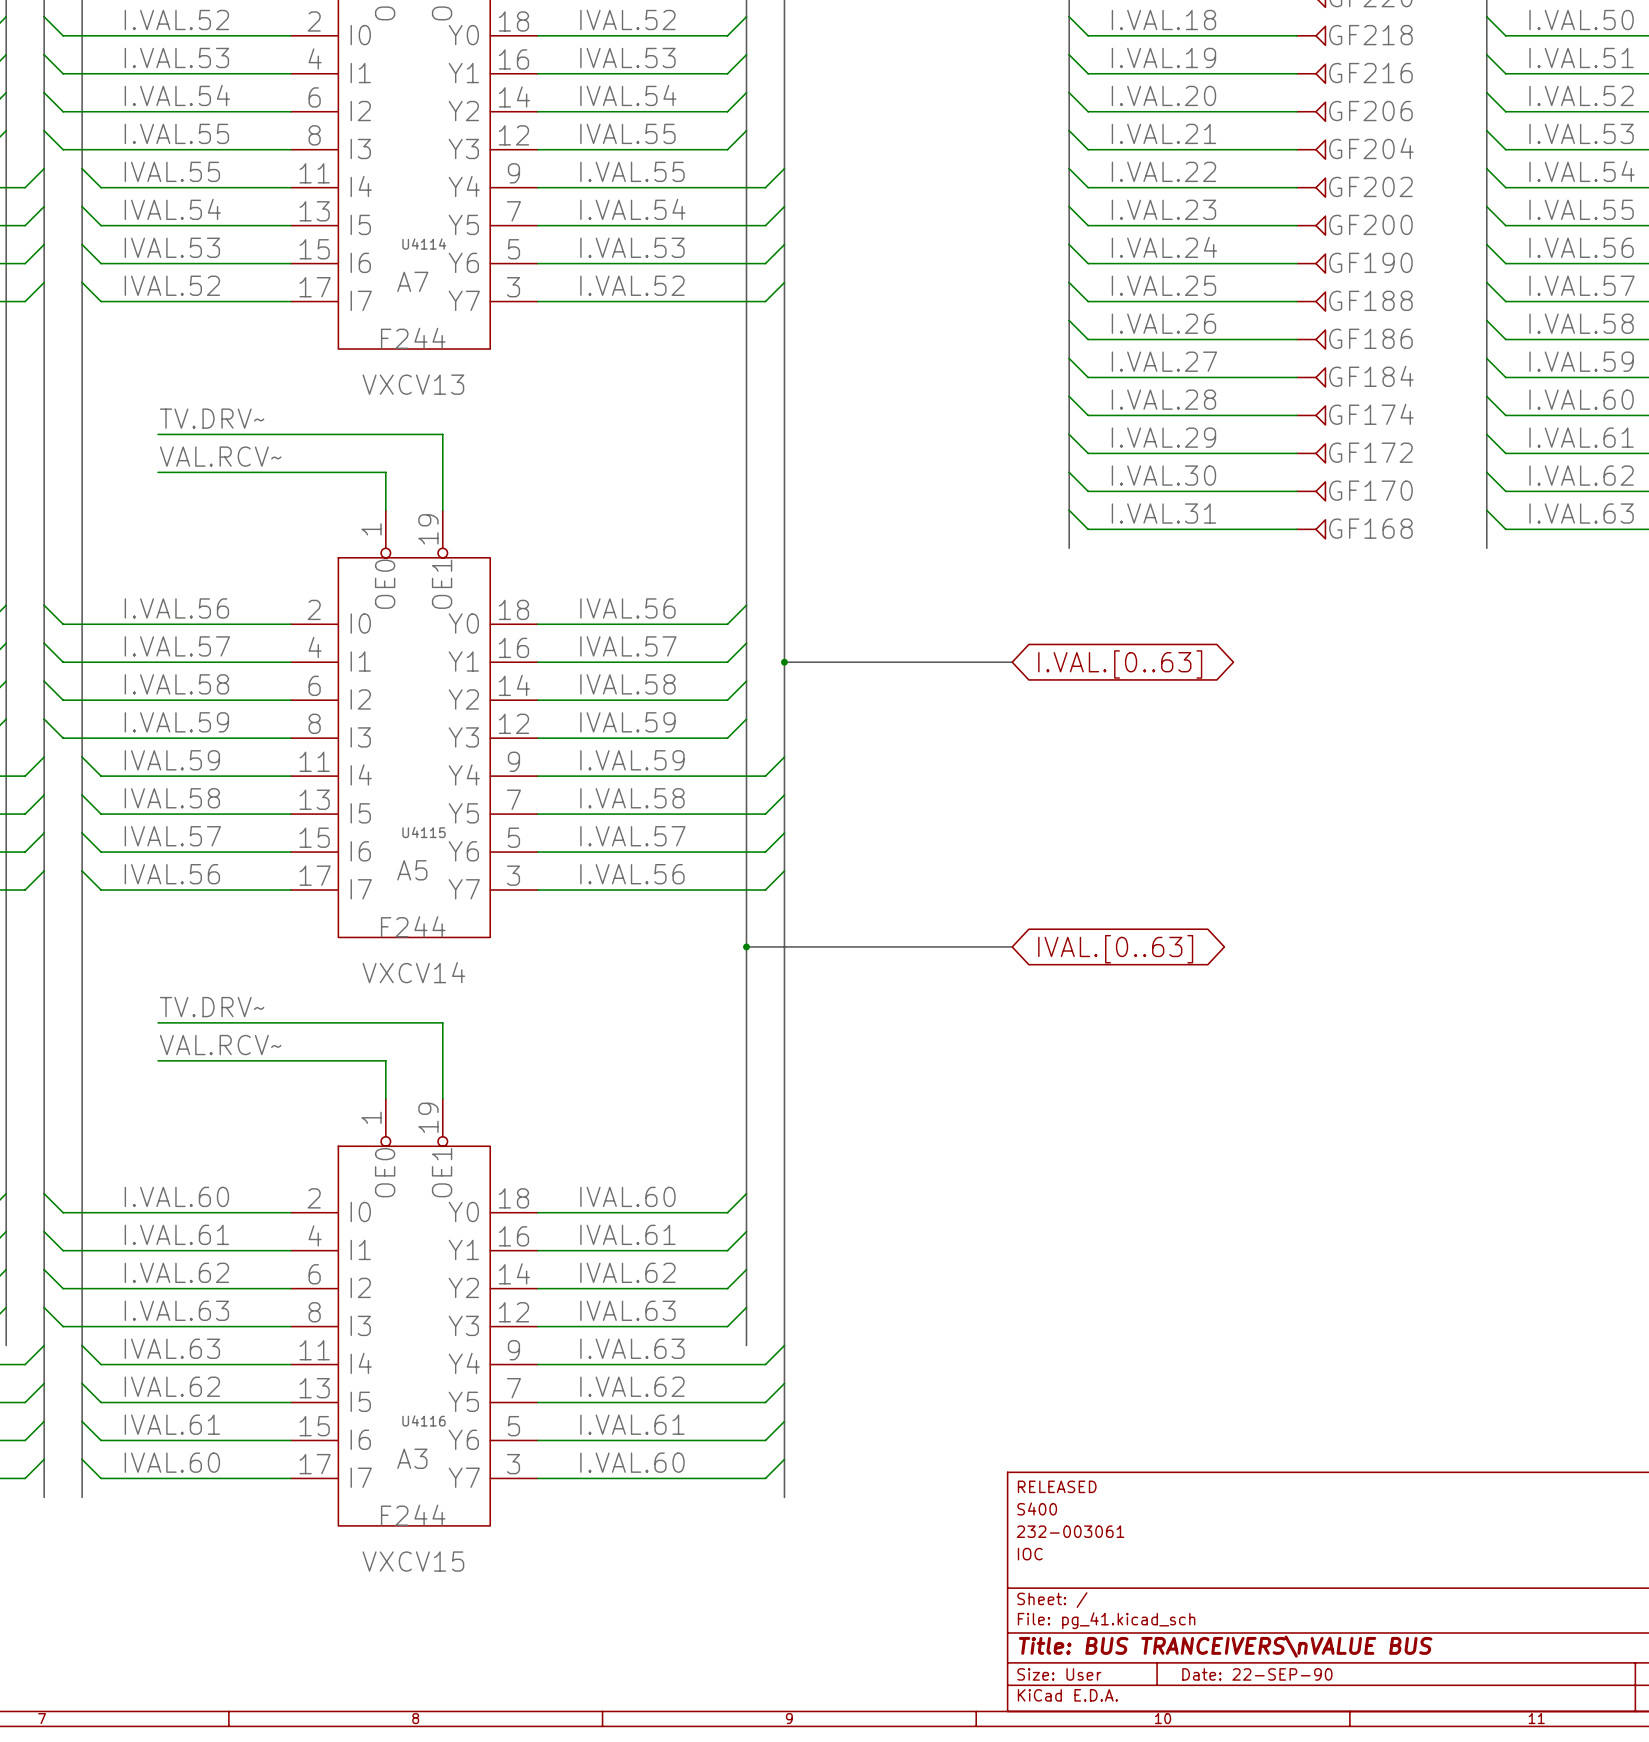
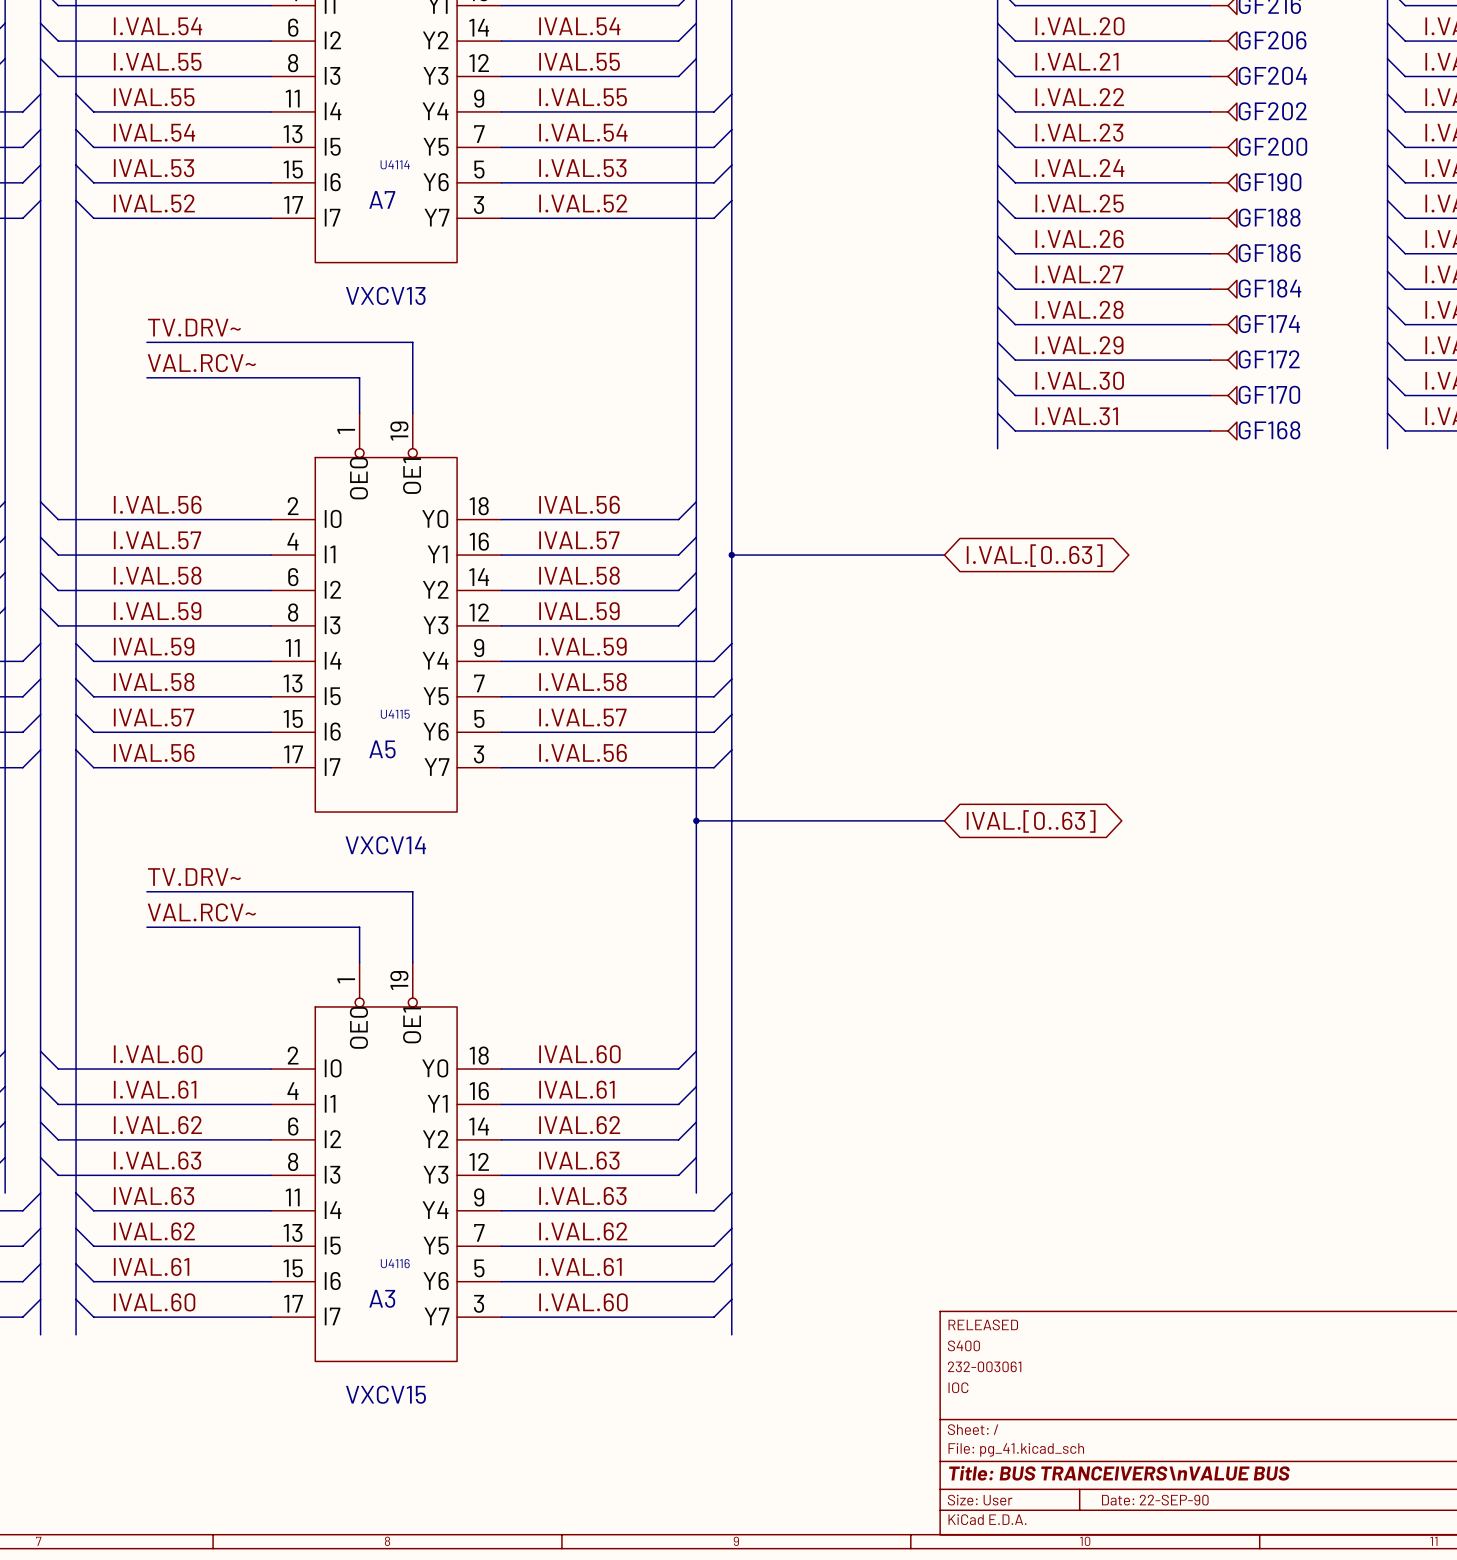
U4114 value: F244 (413, 338) -> none
U4115 value: F244 (413, 926) -> none
U4116 value: F244 (413, 1515) -> none

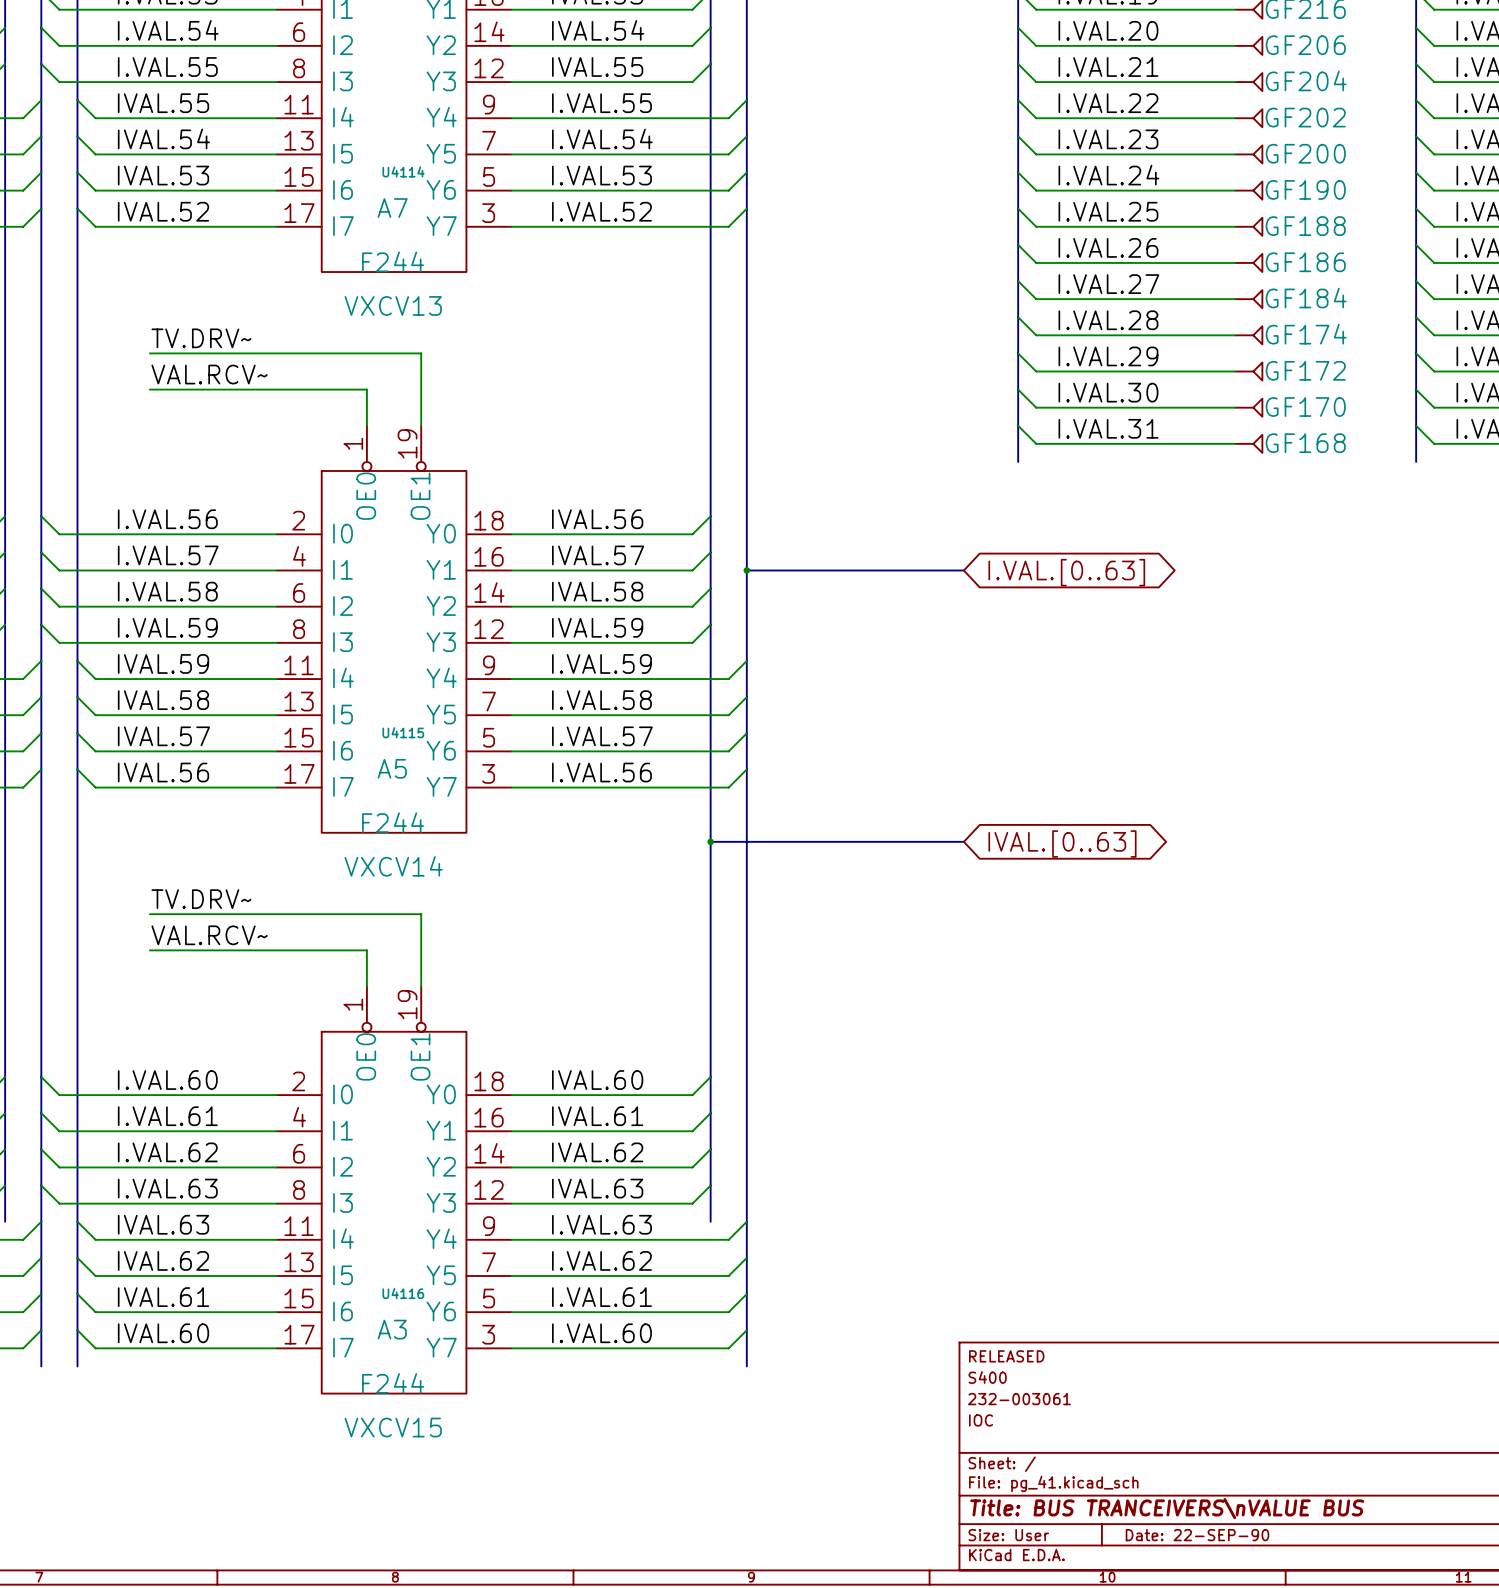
U4114 value: none -> F244 (393, 261)
U4115 value: none -> F244 (393, 822)
U4116 value: none -> F244 (393, 1383)

